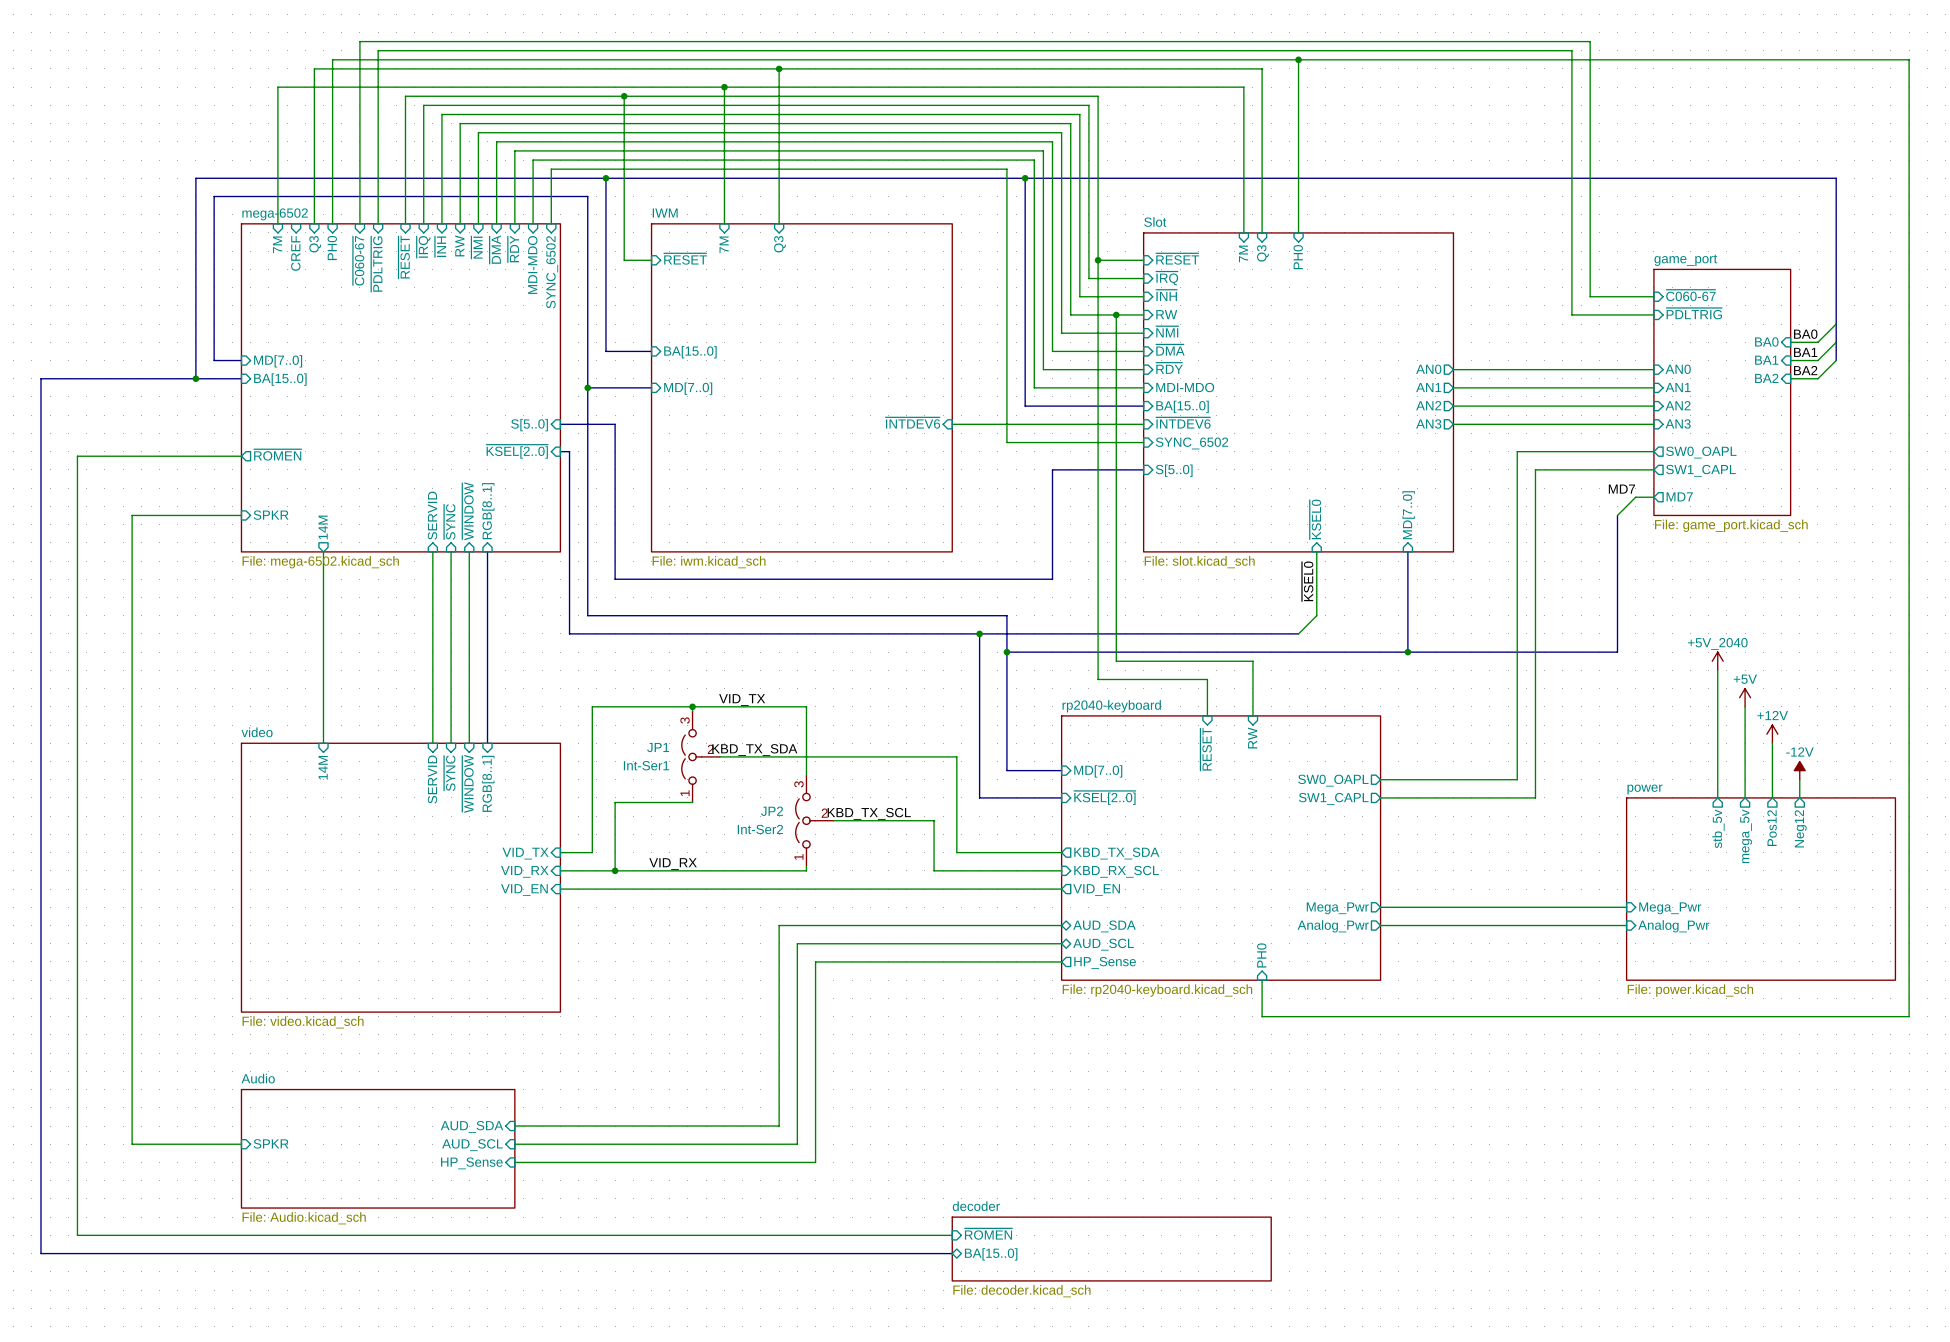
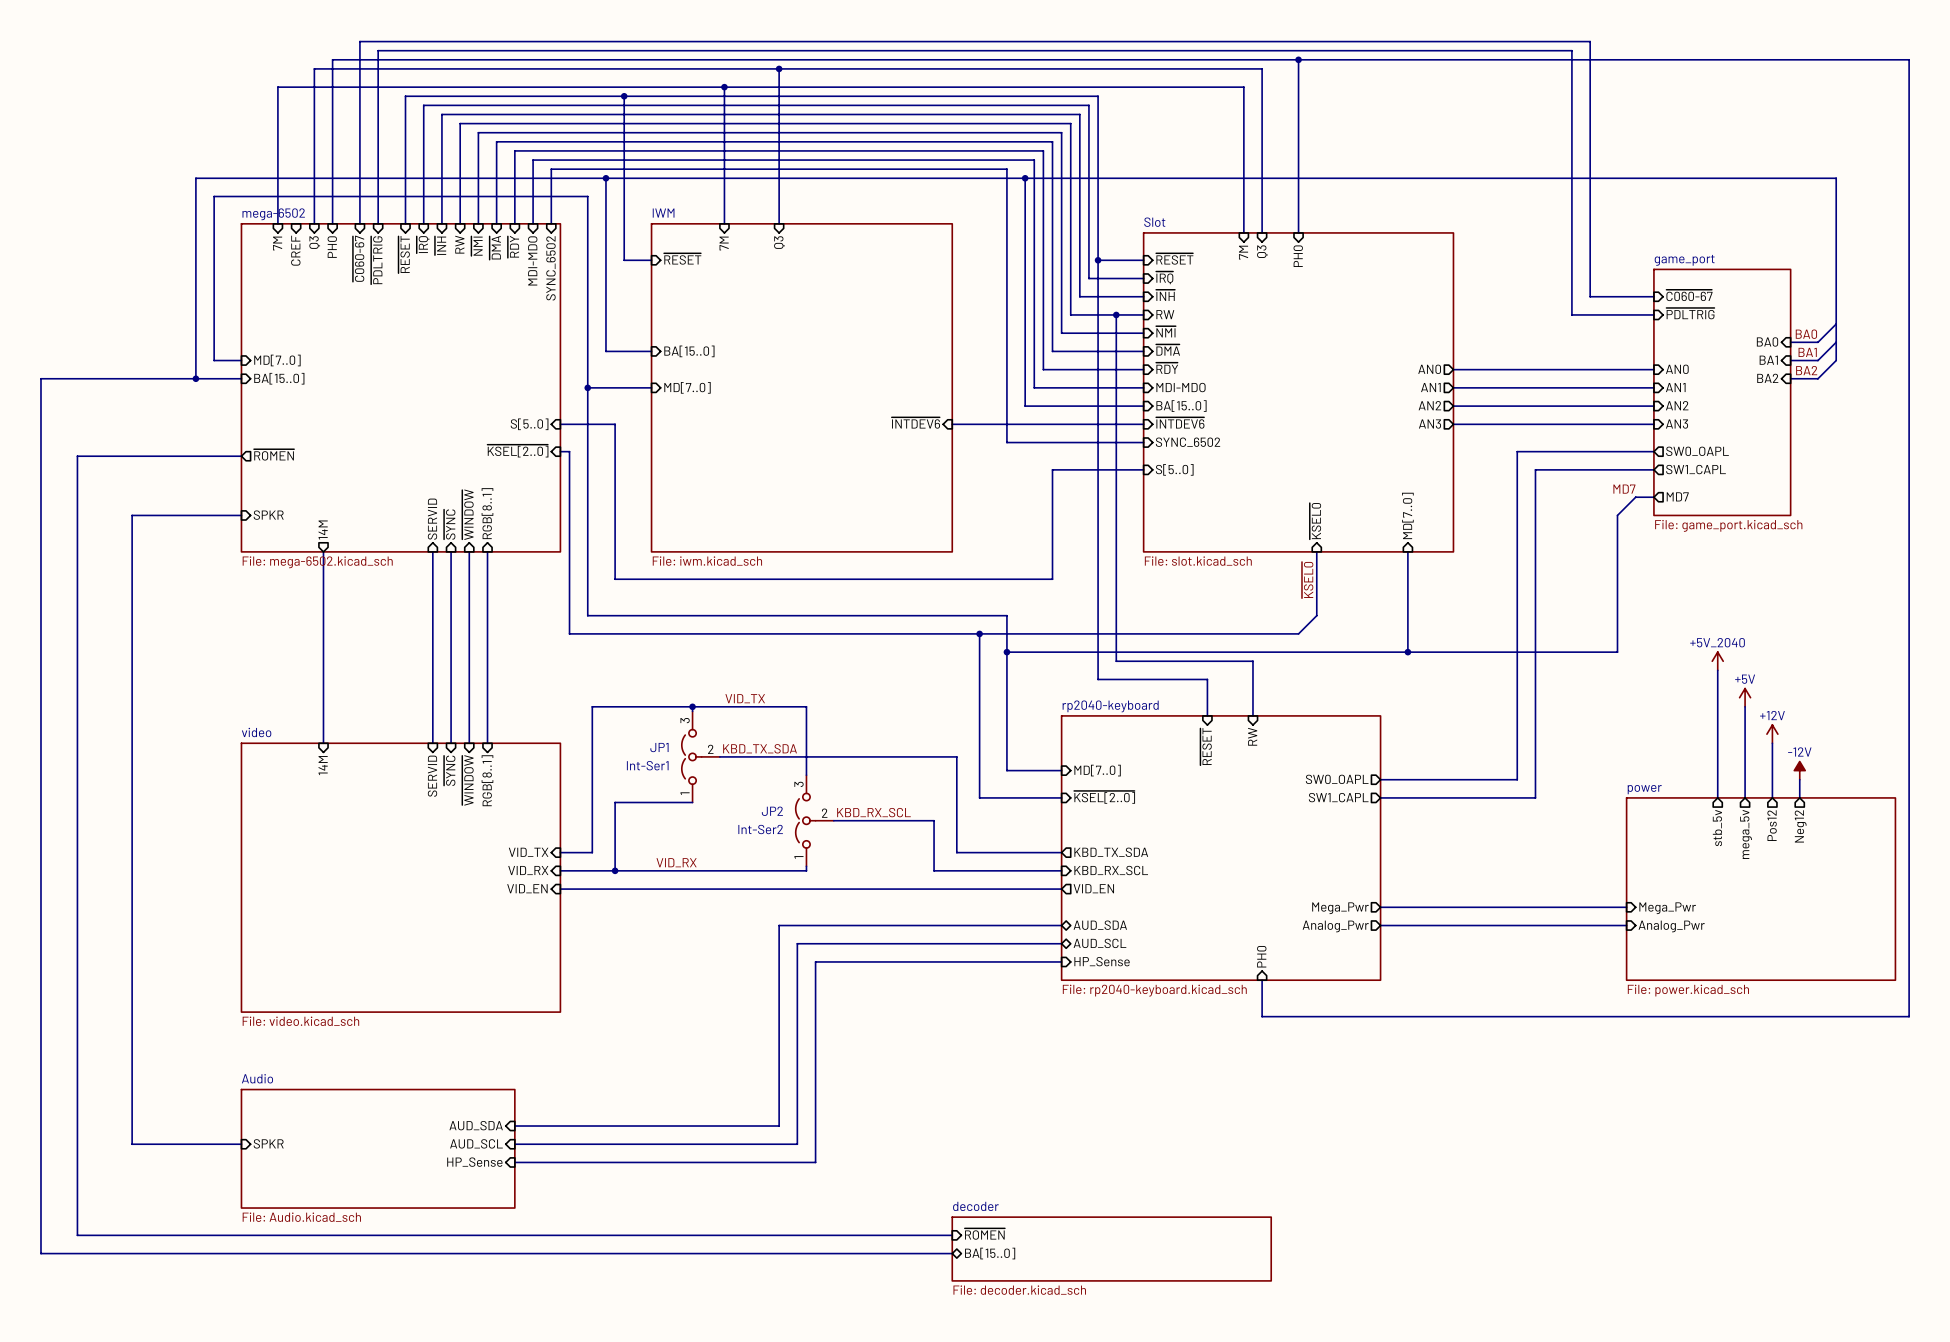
label: KBD_TX_SCL (869, 813) -> KBD_RX_SCL (873, 812)
sheet pin shape: output (1105, 962) -> input (1102, 961)

